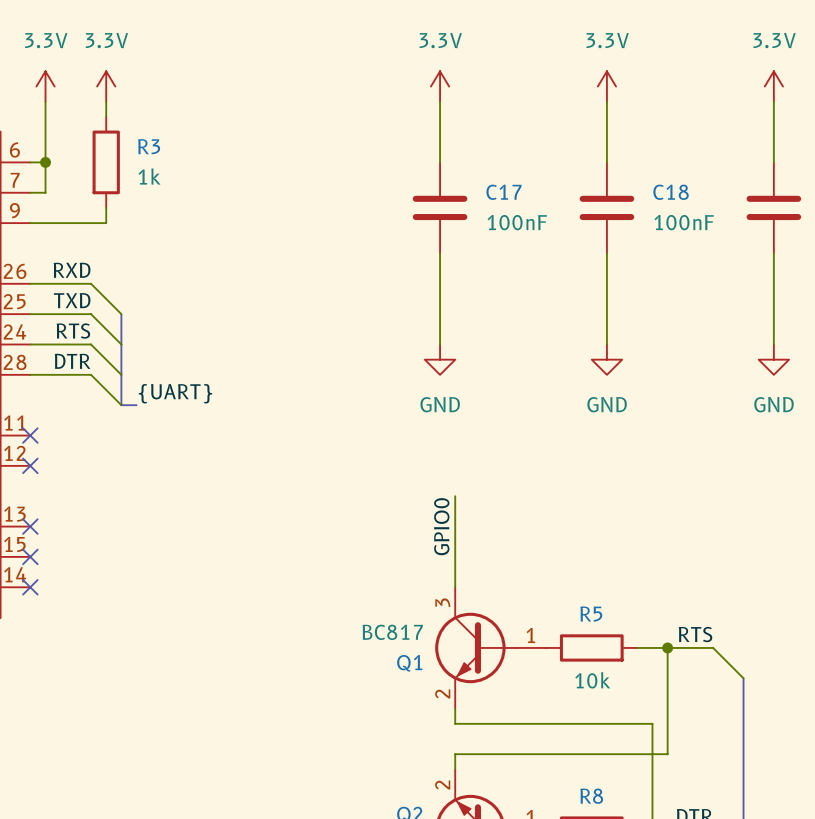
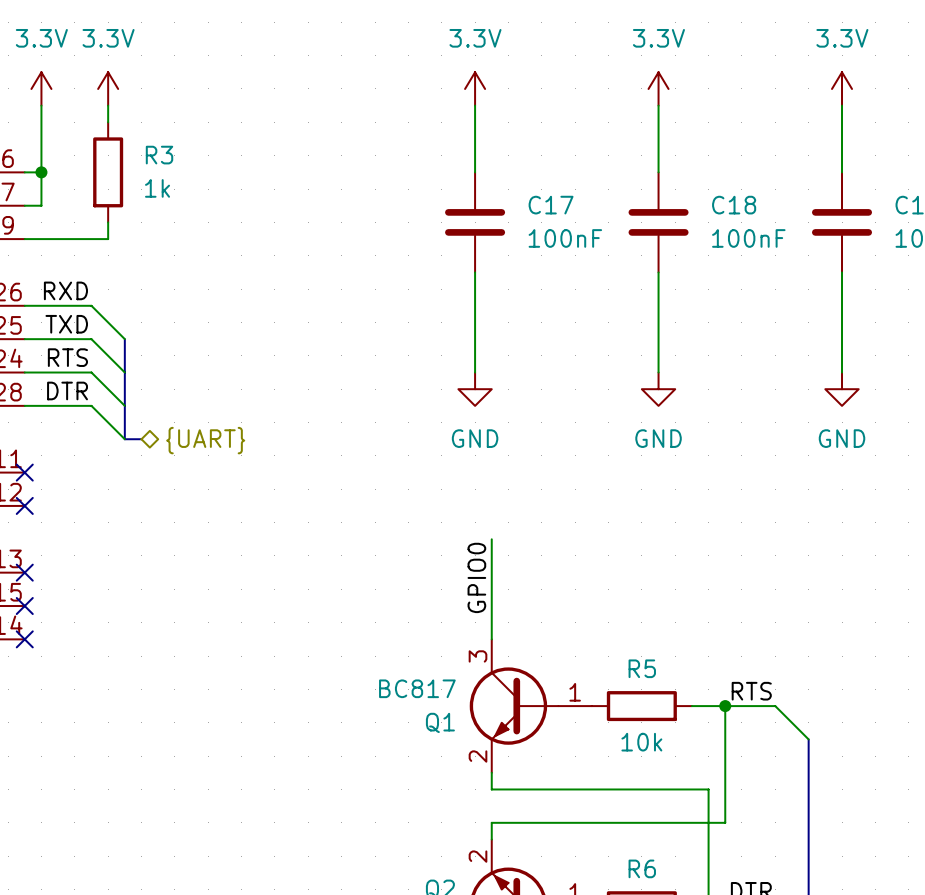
label: {UART} (175, 393) -> none
hierarchical label: none -> {UART} (205, 440)
R8 name: R8 (591, 796) -> R6 (642, 868)

